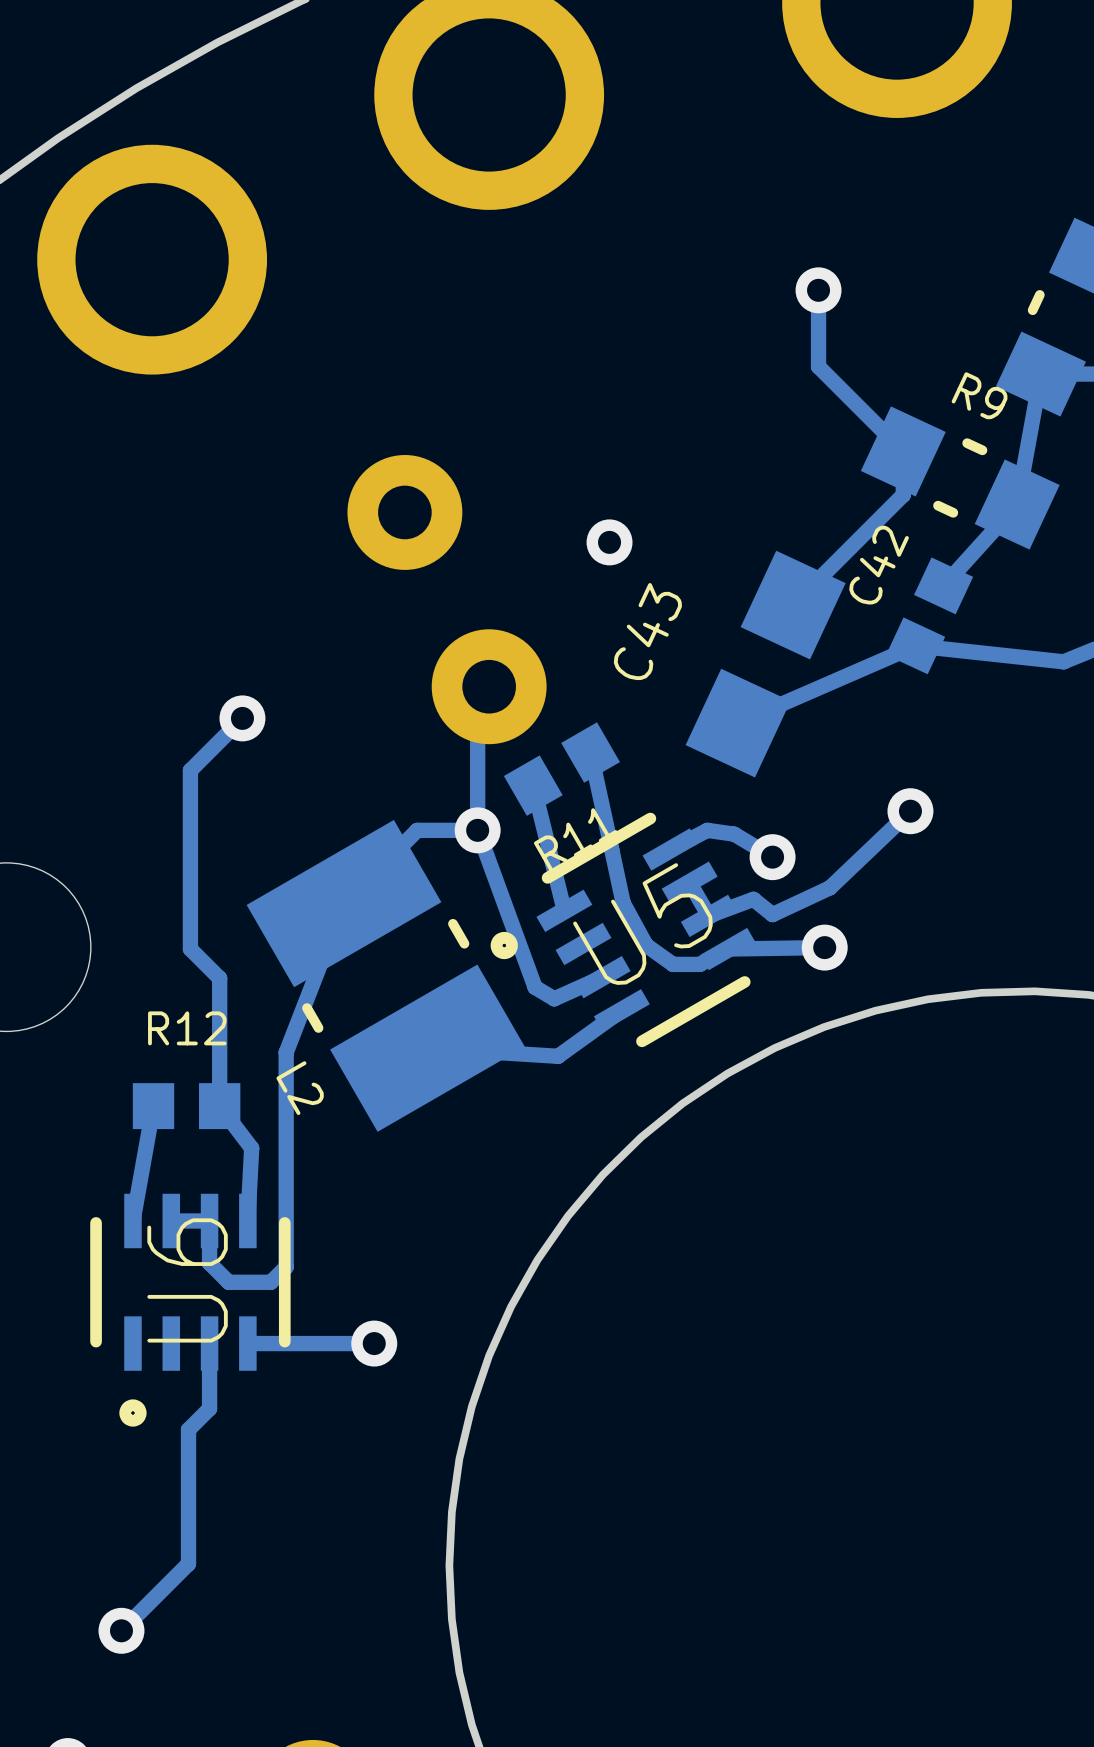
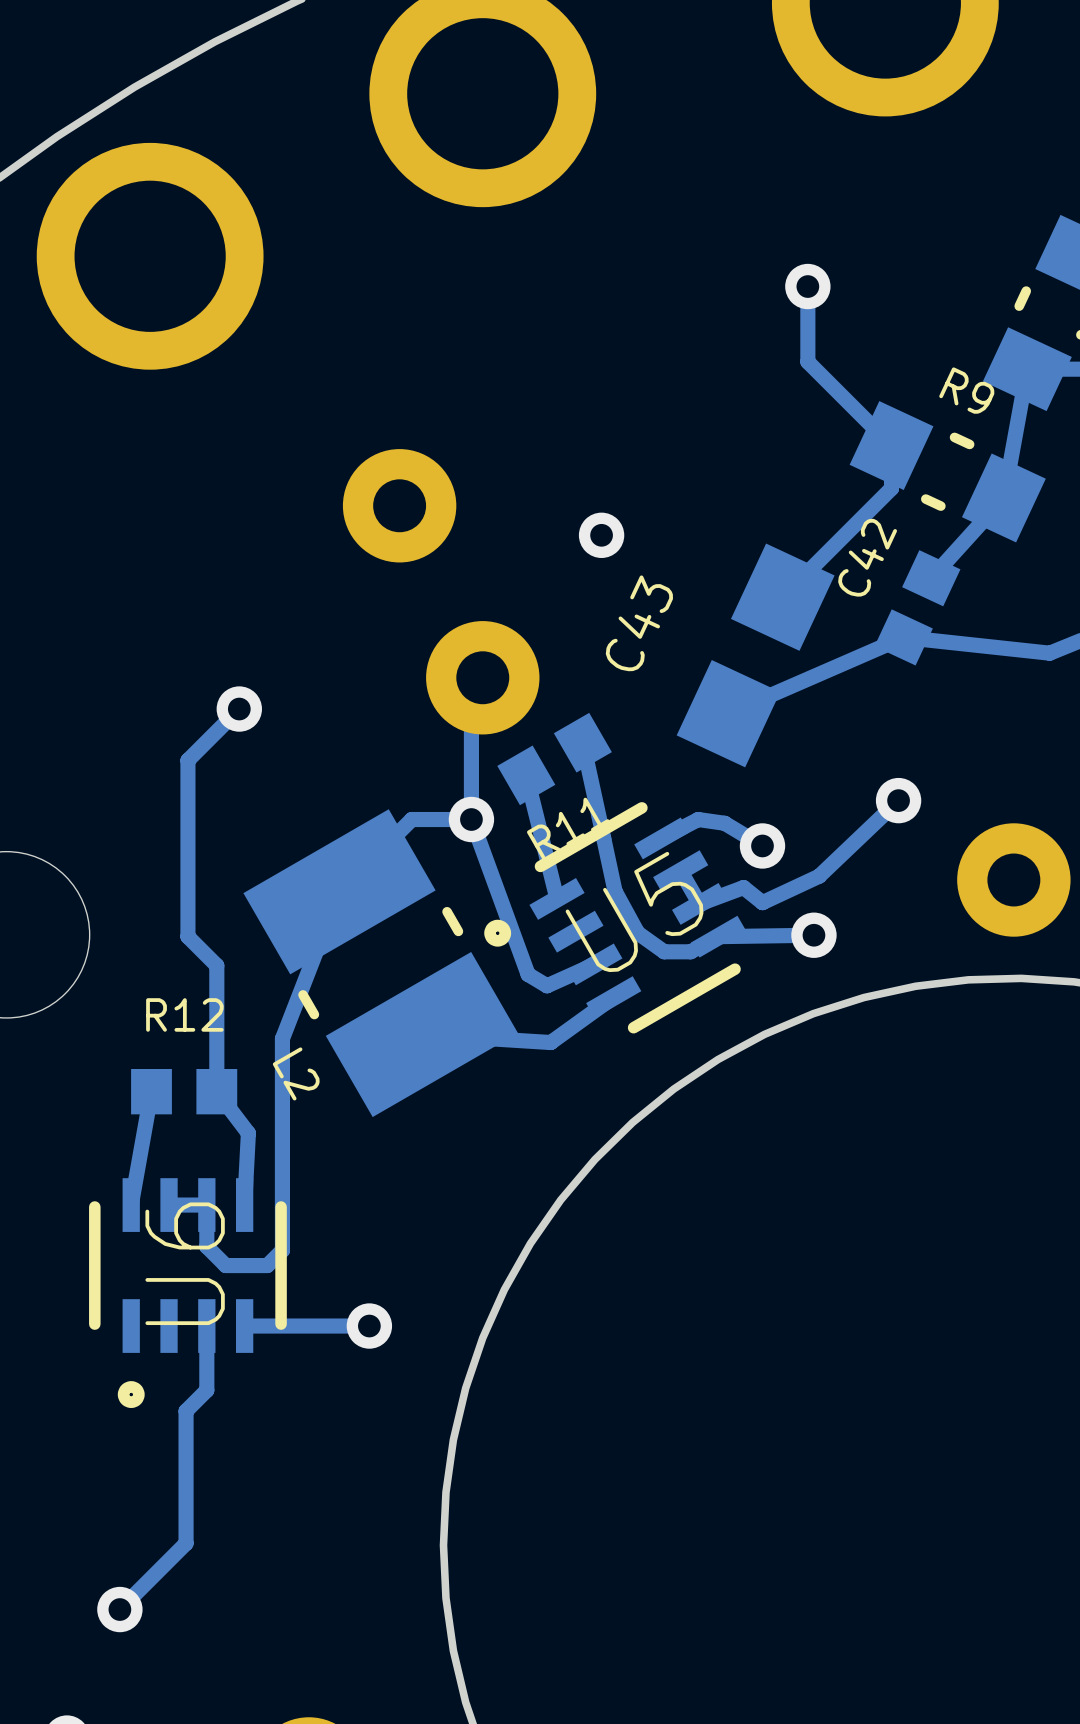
part: none -> (1013, 879)

